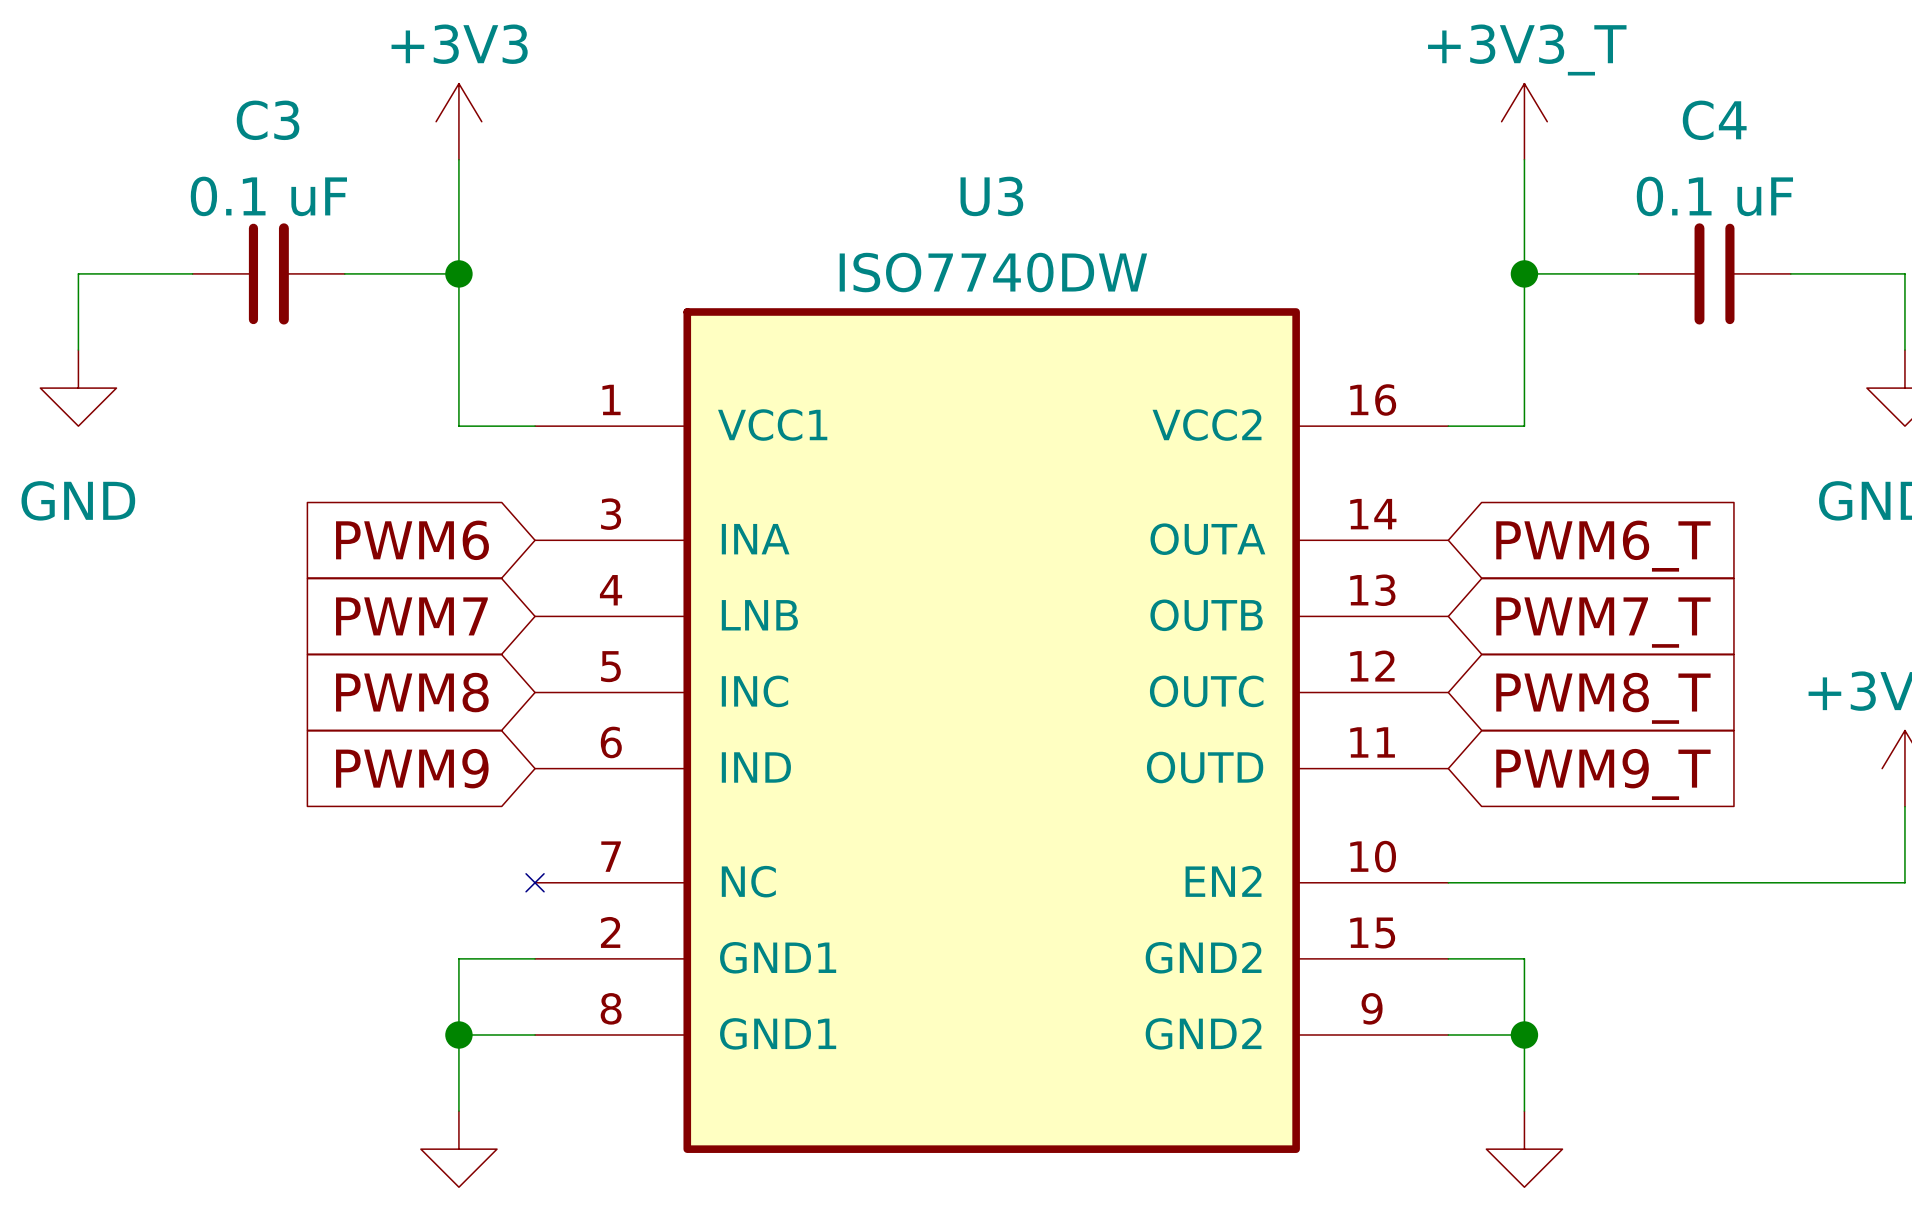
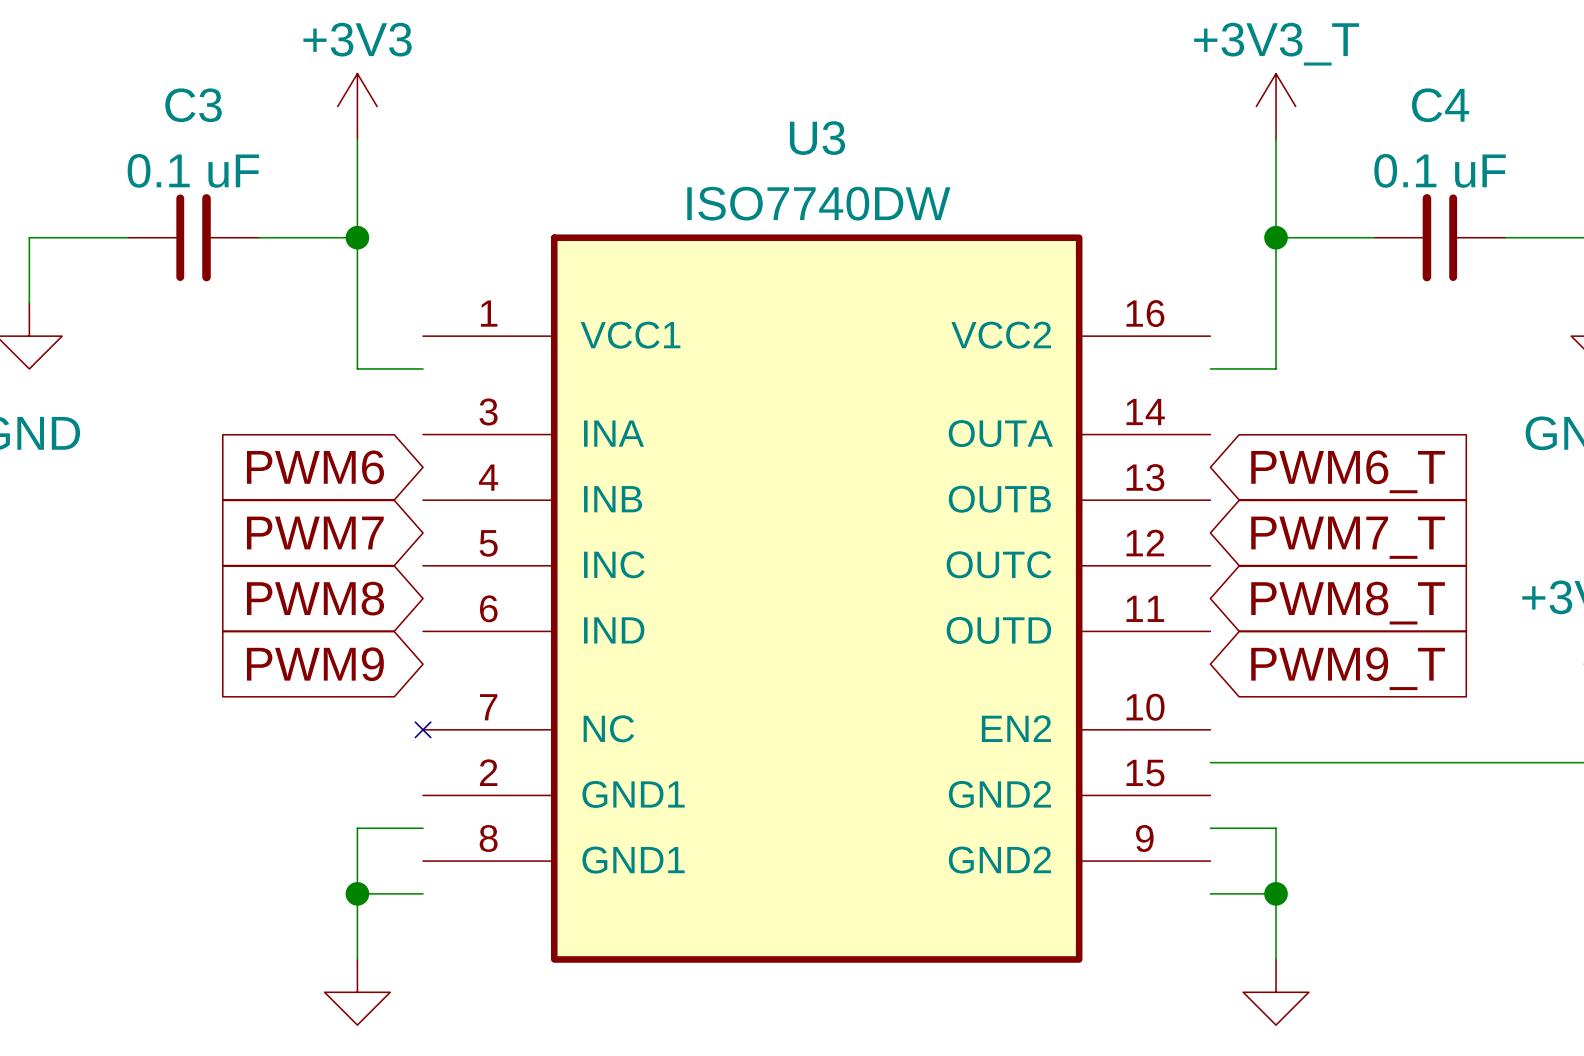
U3 pin name: LNB (759, 615) -> INB (613, 499)
U3 position: (987, 730) -> (812, 598)

